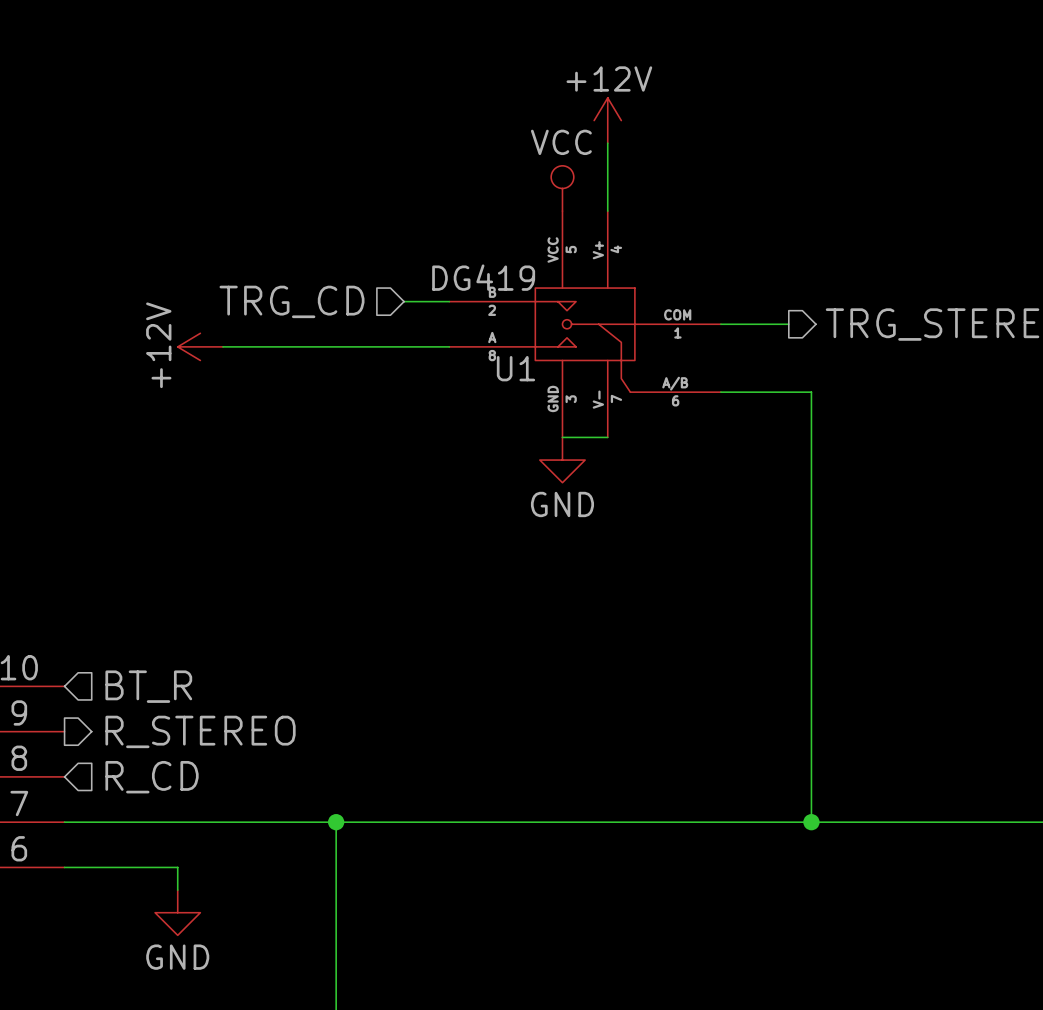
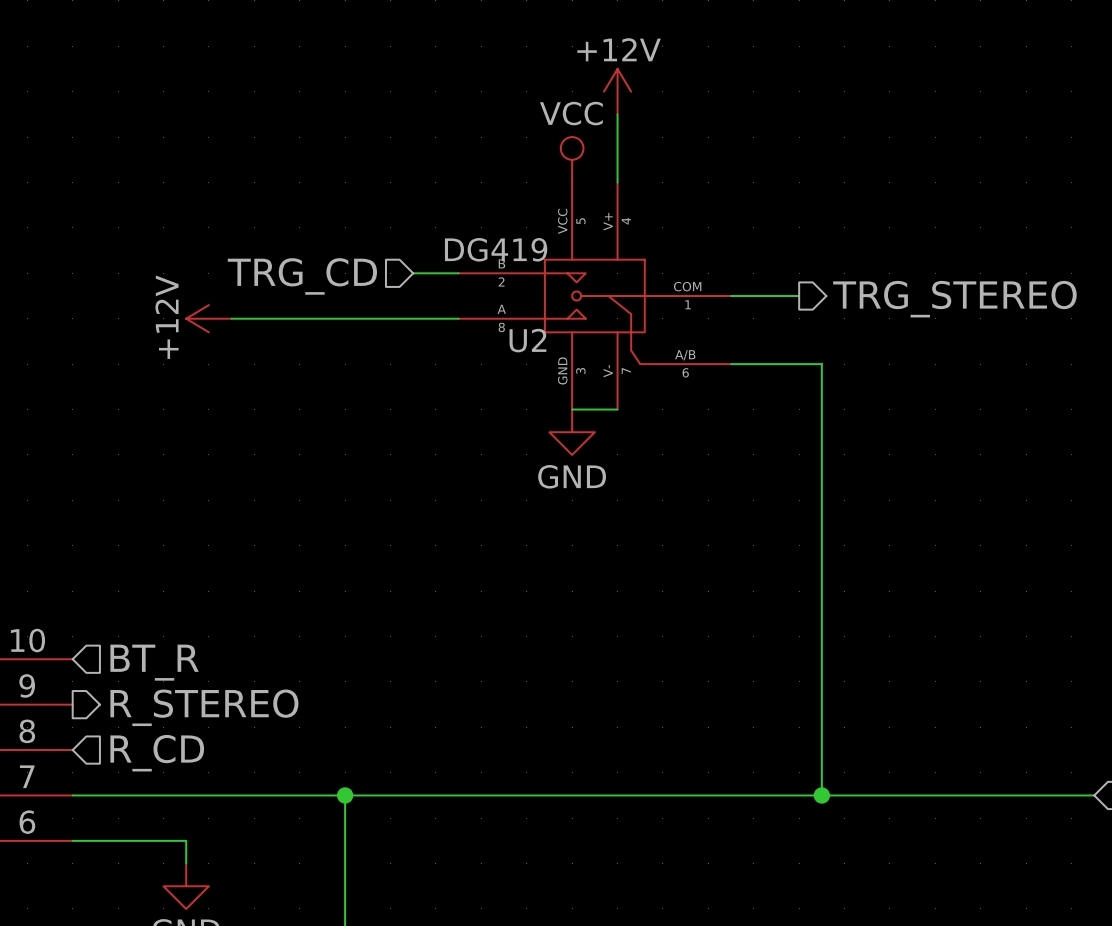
U1 name: U1 (515, 368) -> U2 (527, 340)

